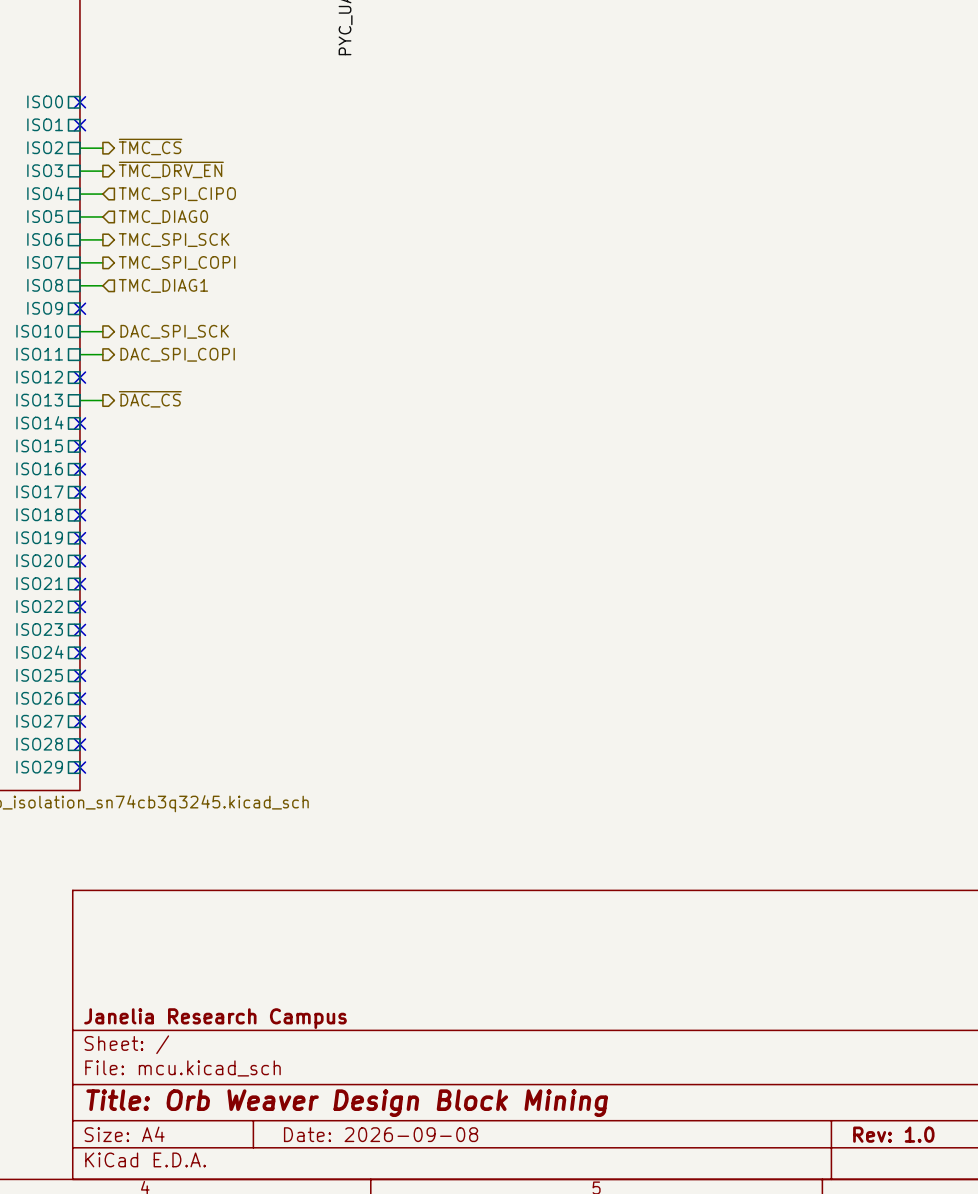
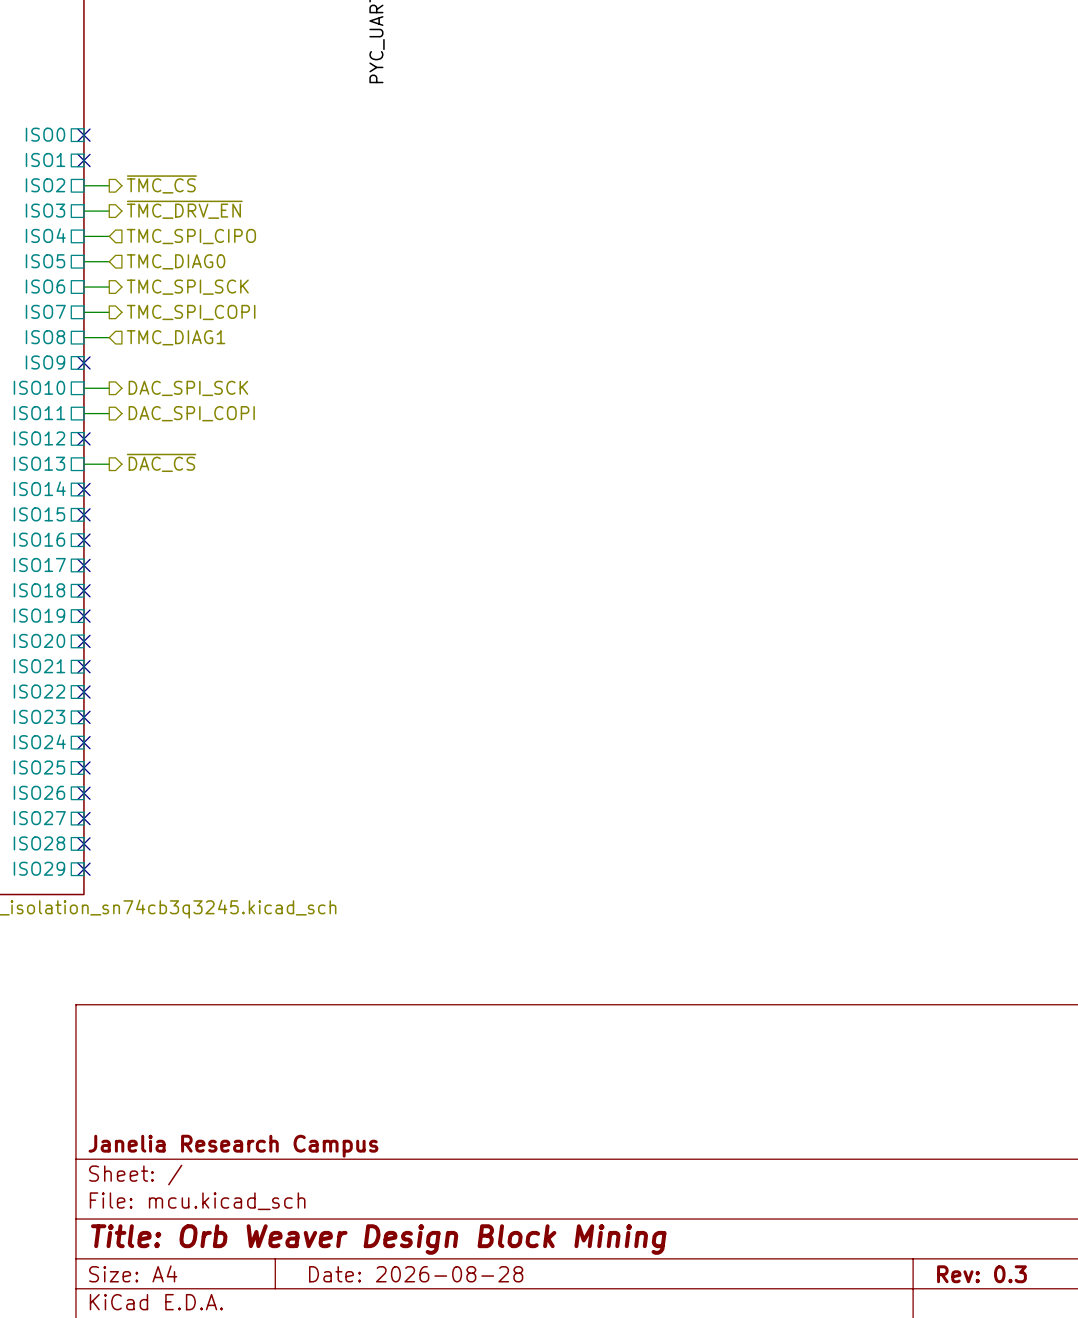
title block: Date: 2026-09-08 (381, 1134) -> Date: 2026-08-28 (416, 1274)
title block: Rev: 1.0 (893, 1134) -> Rev: 0.3 (981, 1274)

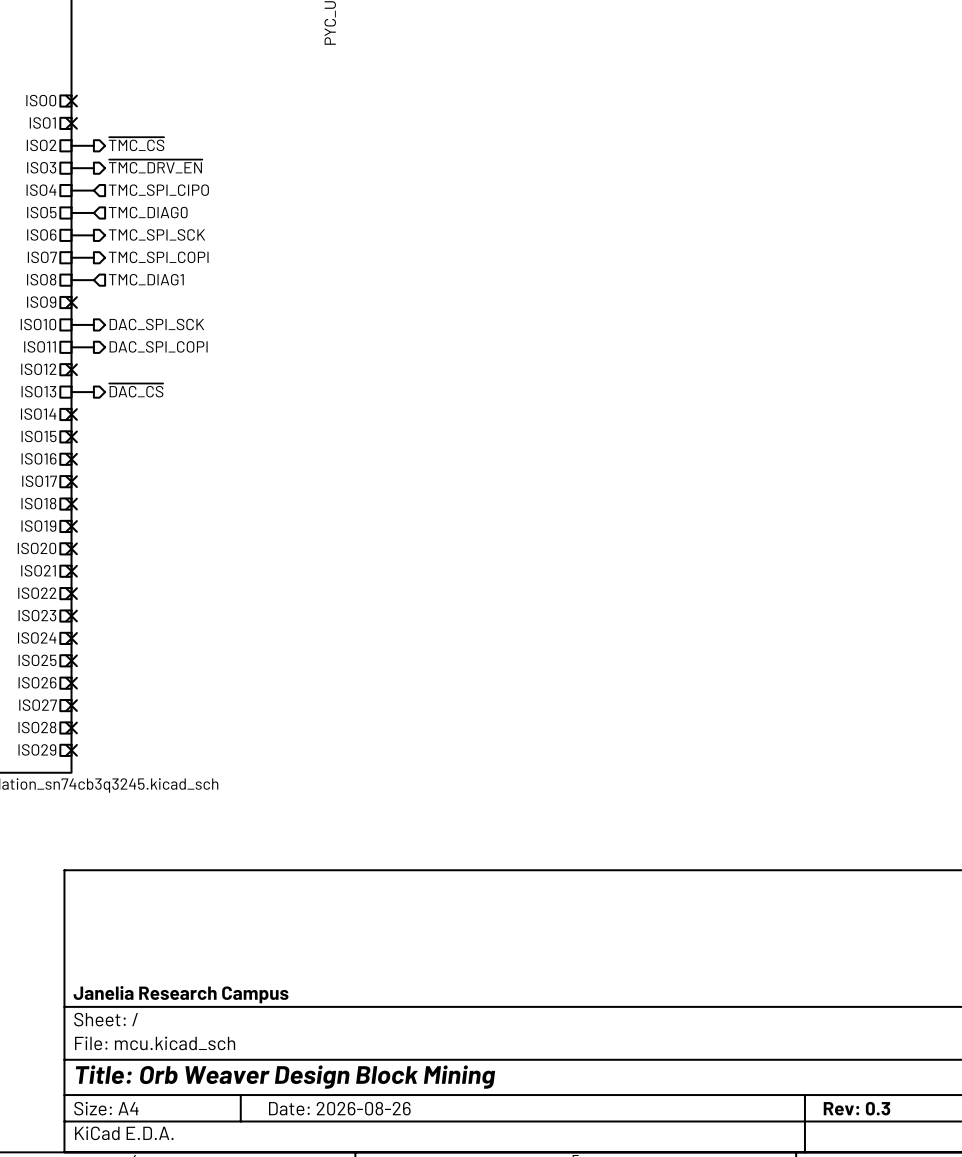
title block: Date: 2026-08-28 (416, 1274) -> Date: 2026-08-26 (339, 1108)

